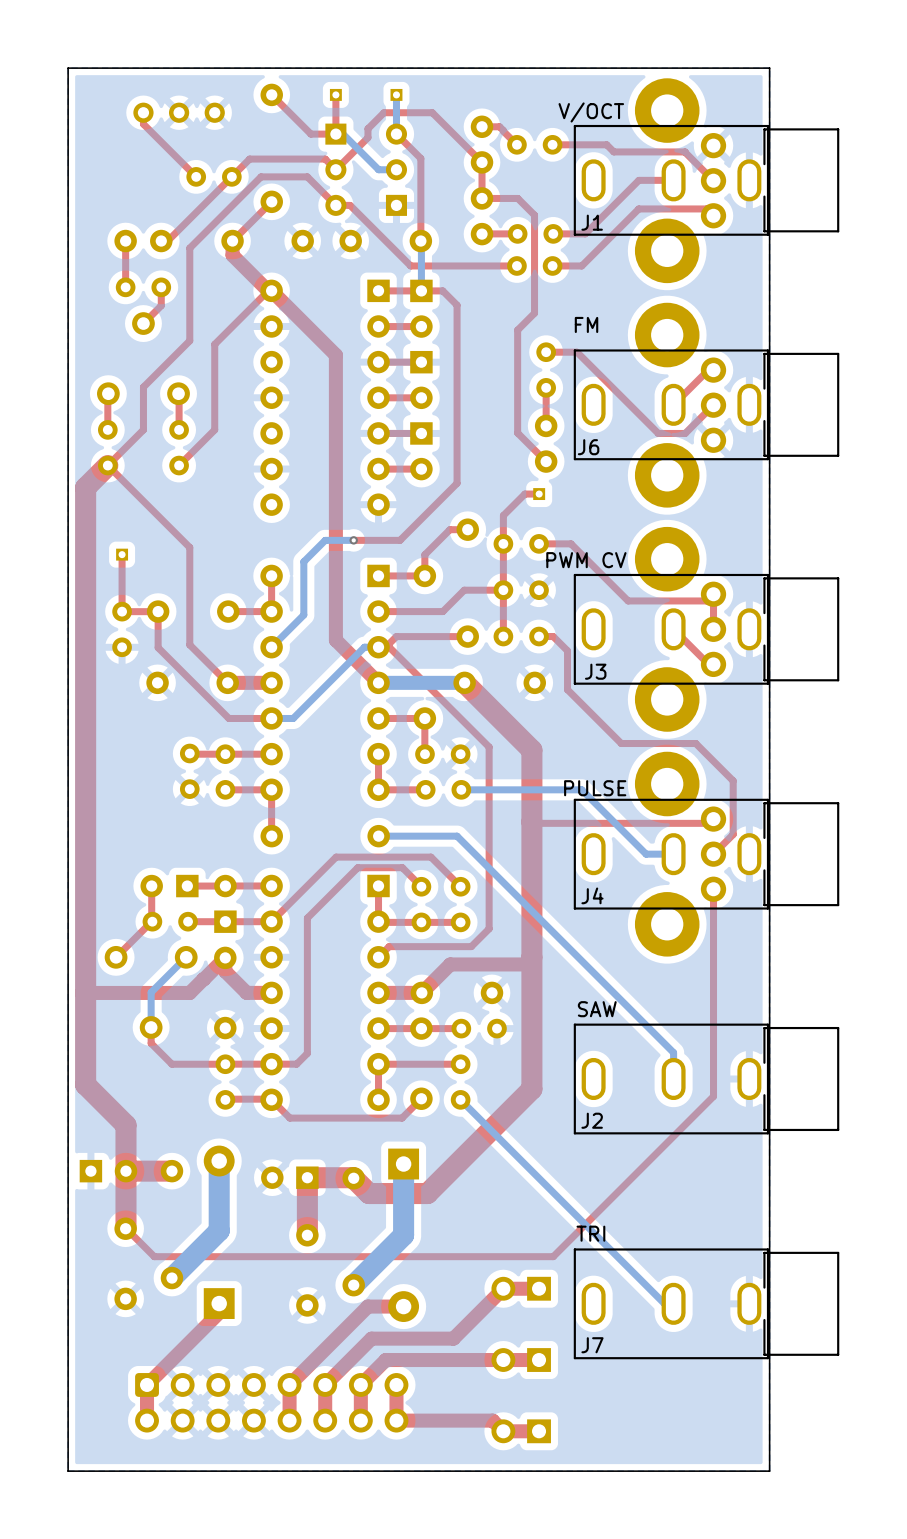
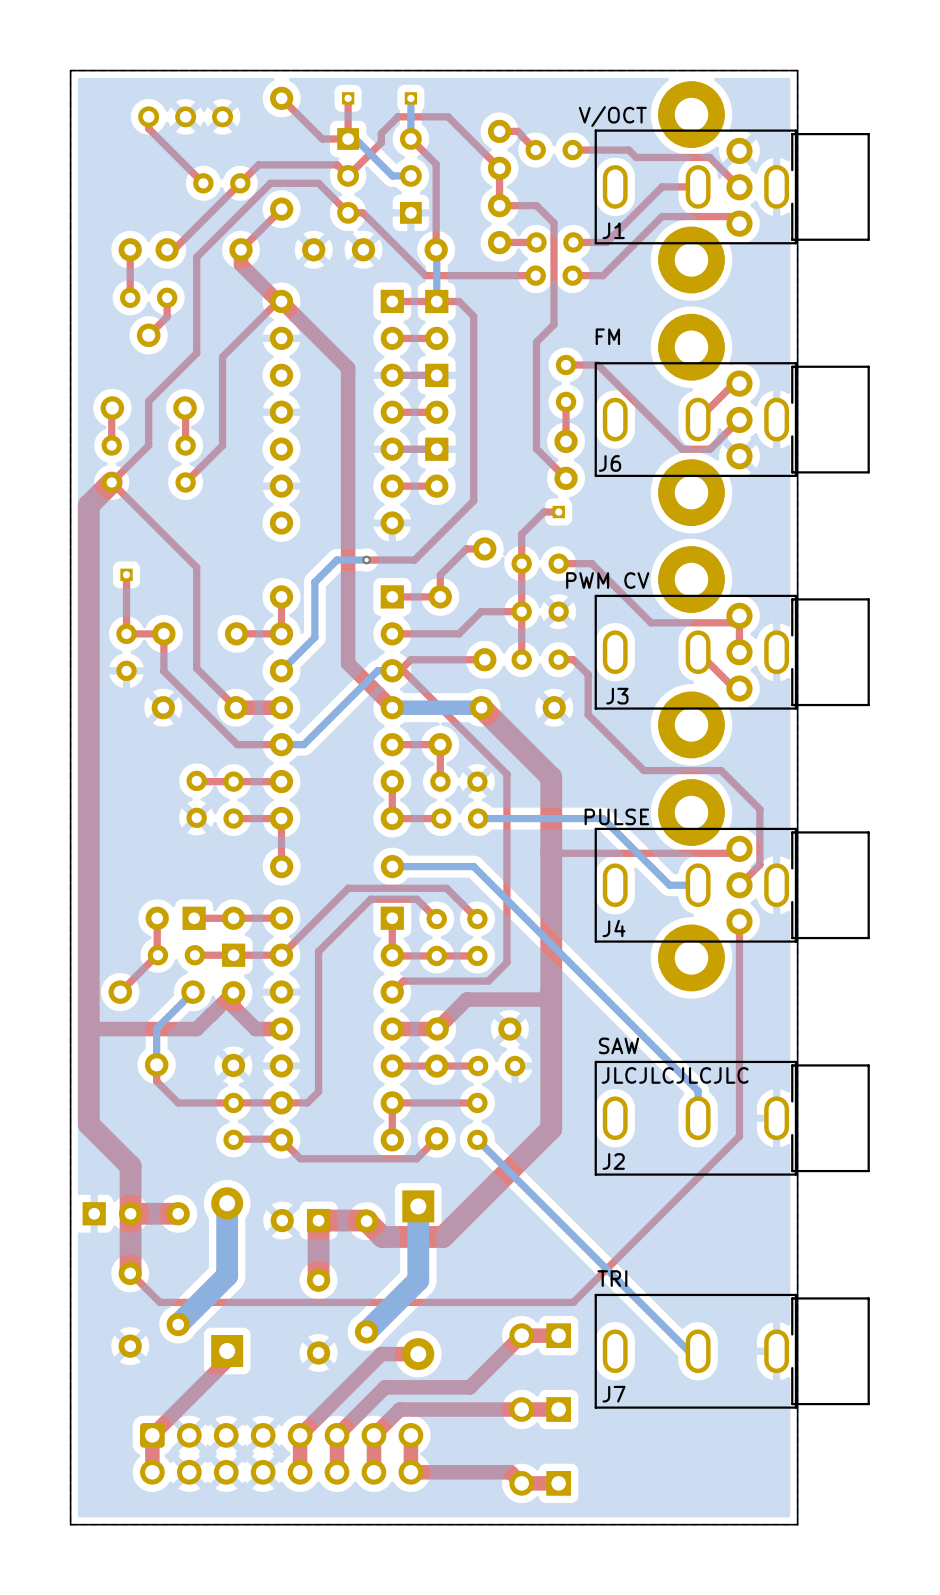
text: none -> JLCJLCJLCJLC (675, 1075)

